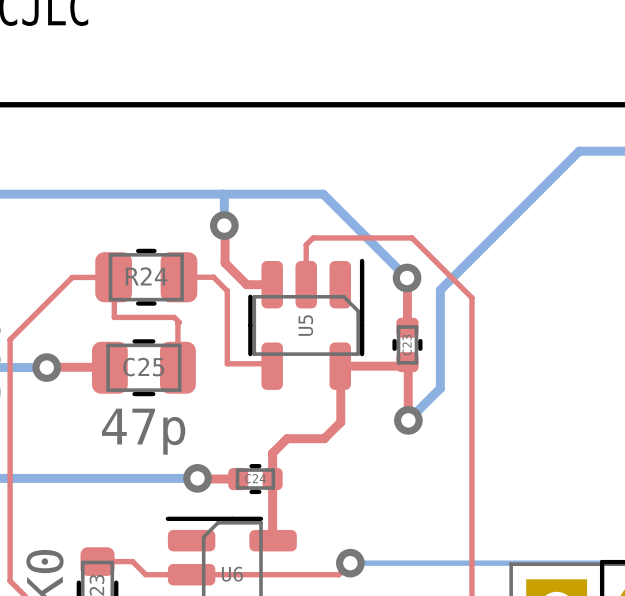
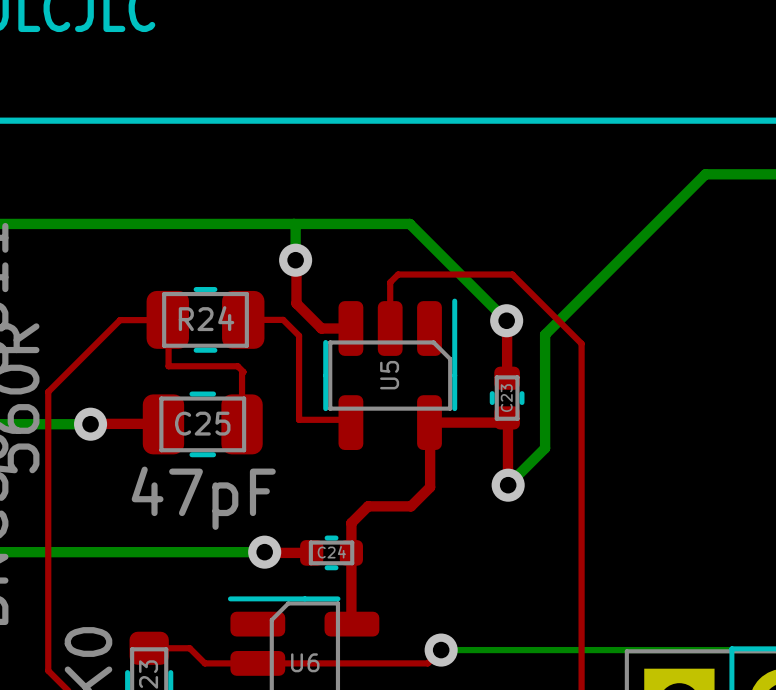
C25 value: 47p (143, 431) -> 47pF (203, 498)

